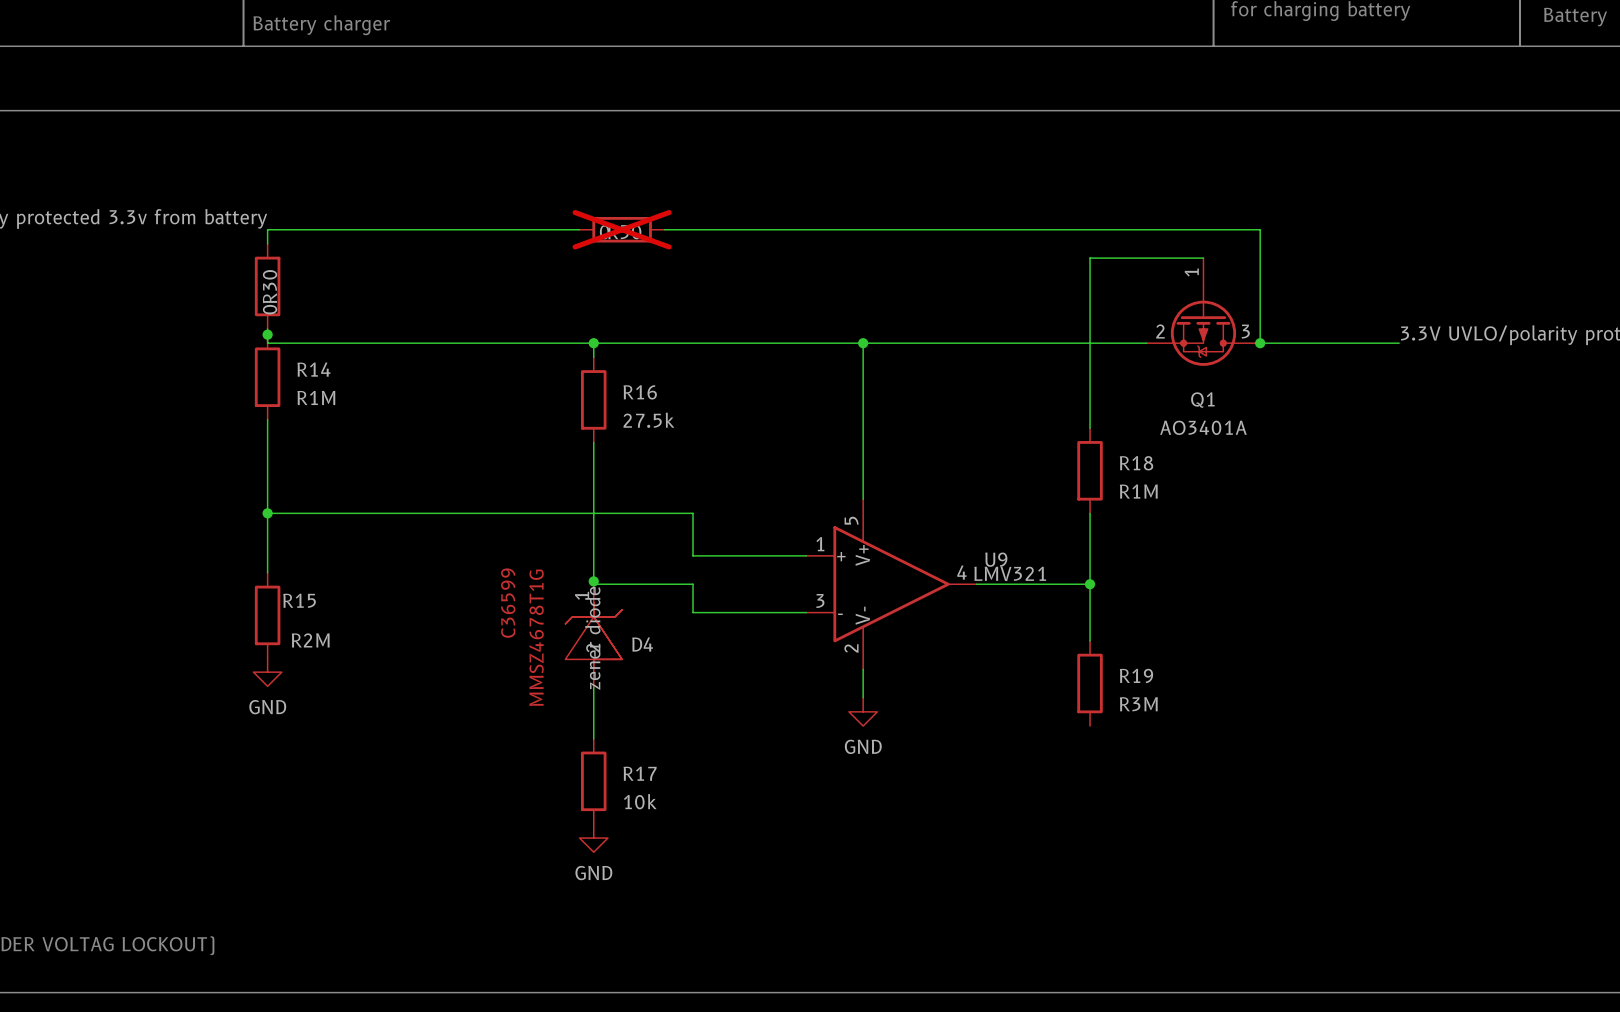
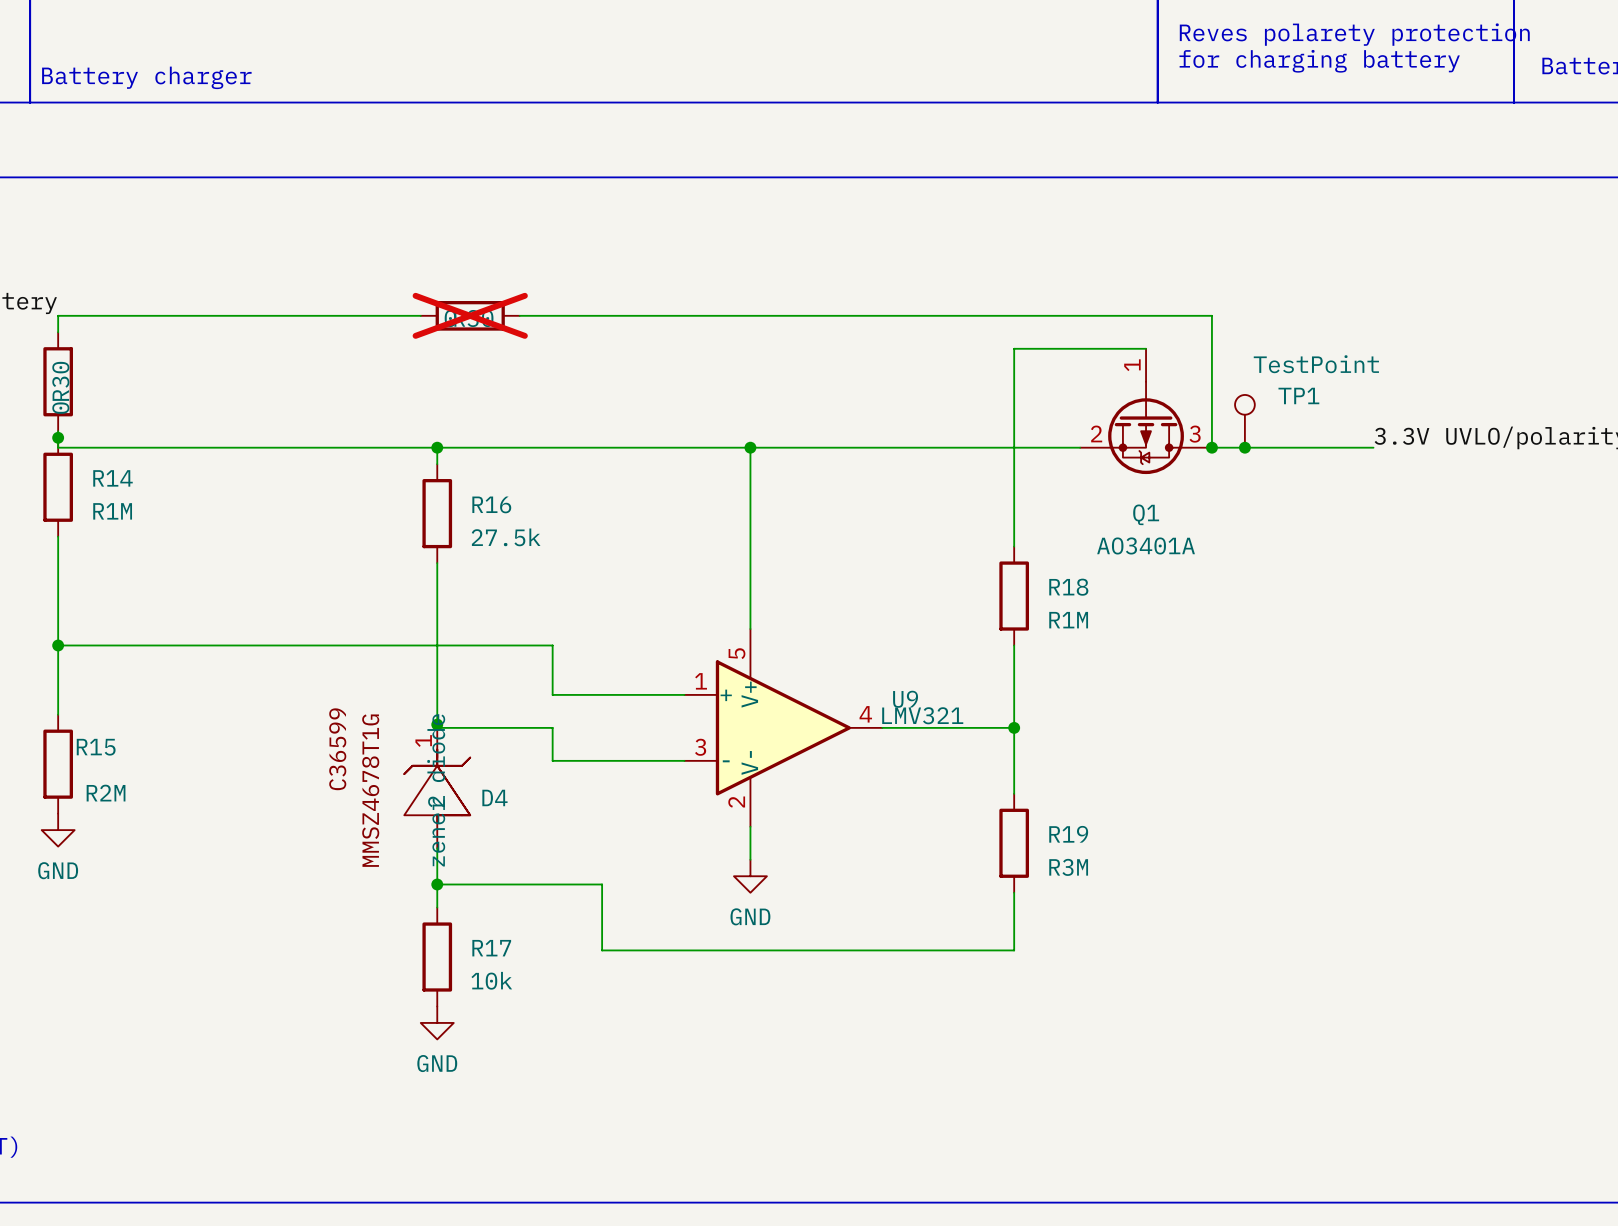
TP1: none -> TestPoint (1244, 421)
junction: none -> (1244, 447)
wire: none -> (437, 884) (602, 884) (602, 950) (1014, 950) (1014, 892)
junction: none -> (437, 884)

